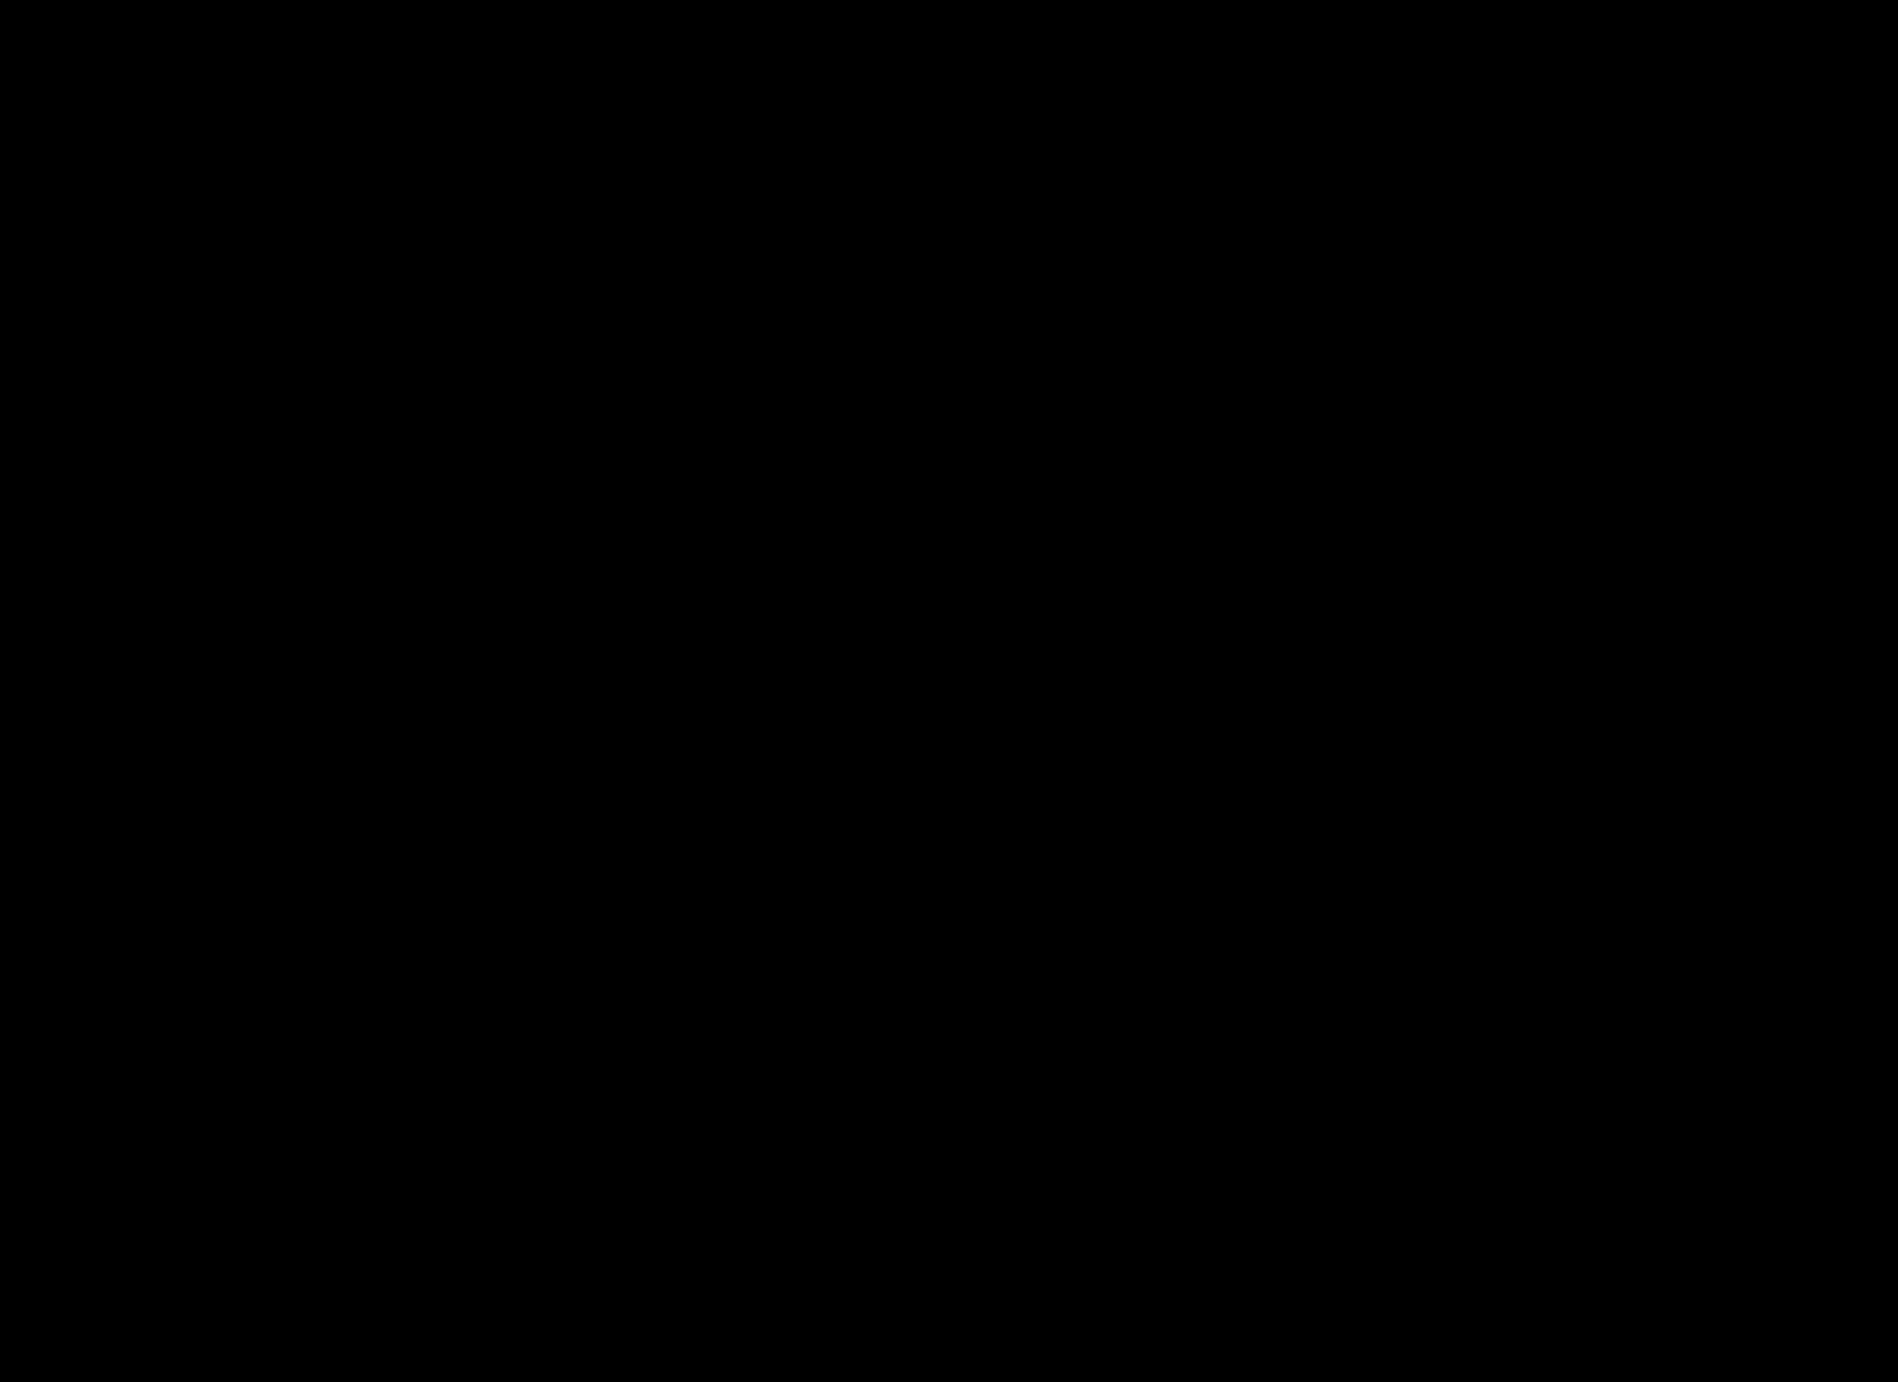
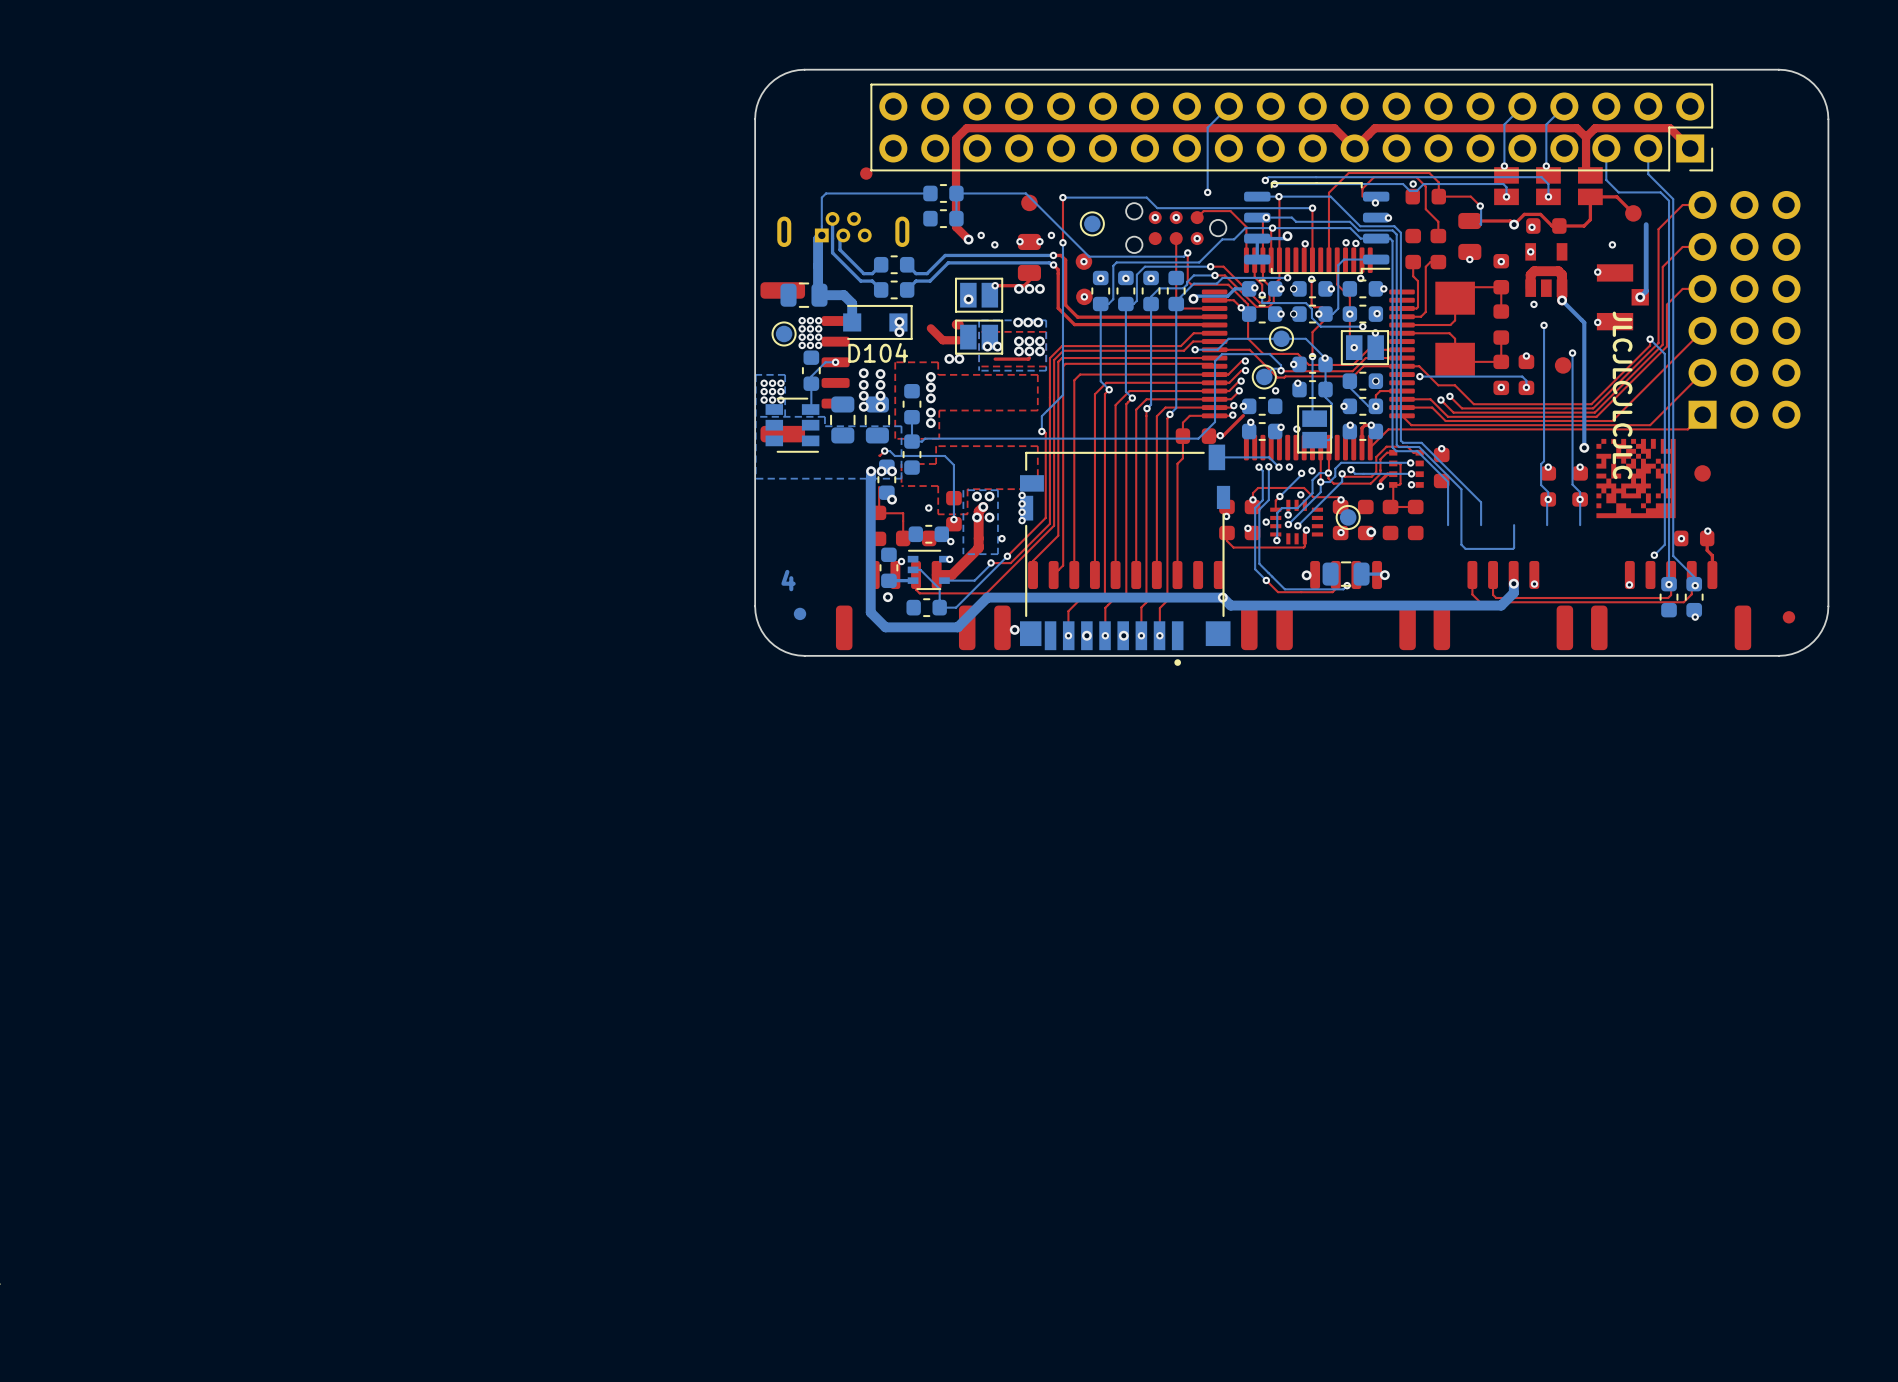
board edge: none -> (1778, 69) (804, 69) (791, 71) (779, 76) (769, 84) (761, 94) (756, 106) (755, 119) (755, 606) (756, 619) (761, 631) (769, 641) (779, 649) (791, 654) (804, 655) (1778, 655) (1791, 654) (1803, 649) (1813, 641) (1821, 631) (1826, 619) (1828, 606) (1828, 119) (1824, 100) (1813, 84) (1797, 73) (1778, 69)
bottom track: none -> (1228, 106) (1207, 127) (1207, 192)
bottom track: none -> (1522, 106) (1504, 124) (1504, 166)
bottom track: none -> (1564, 106) (1546, 124) (1546, 166)
part: none -> (1291, 127)
top track: none -> (1586, 137) (1595, 128) (1669, 128) (1690, 148)
top track: none -> (1586, 137) (1586, 171) (1590, 175)
top track: none -> (1586, 137) (1576, 128) (1374, 128) (1354, 148) (1334, 128) (966, 128) (956, 138) (956, 227) (968, 239)
bottom track: none -> (1606, 148) (1606, 180) (1618, 192) (1660, 192) (1669, 200) (1669, 584)
bottom track: none -> (1648, 148) (1648, 174) (1673, 199) (1673, 555) (1694, 576) (1694, 584)
via: none -> (1504, 166)
via: none -> (1546, 166)
part: none -> (866, 173)
bottom track: none -> (1265, 180) (1268, 177) (1541, 177) (1548, 184) (1548, 196)
via: none -> (1265, 180)
bottom track: none -> (1274, 184) (1403, 184) (1409, 190) (1416, 190) (1423, 184) (1503, 184) (1506, 187) (1506, 196)
via: none -> (1274, 184)
via: none -> (1413, 184)
part: none -> (1506, 186)
part: none -> (1548, 186)
part: none -> (1590, 186)
via: none -> (1207, 192)
bottom track: none -> (930, 193) (826, 193) (821, 197) (821, 235) (818, 239) (818, 293) (843, 295) (852, 303) (852, 322)
part: none -> (943, 193)
bottom track: none -> (1257, 196) (1330, 196) (1360, 226) (1394, 226) (1400, 232) (1400, 440) (1403, 442) (1421, 442) (1481, 502) (1481, 525)
top track: none -> (1278, 196) (1279, 279) (1273, 284) (1273, 302) (1269, 306) (1256, 306) (1225, 275) (1214, 275)
via: none -> (1278, 196)
top track: none -> (1362, 196) (1362, 188) (1374, 177) (1416, 177) (1425, 186) (1425, 209) (1438, 221) (1438, 236)
part: none -> (1425, 196)
via: none -> (1506, 196)
via: none -> (1548, 196)
bottom track: none -> (1062, 197) (1146, 197) (1157, 208) (1312, 208)
top track: none -> (1062, 197) (1062, 242)
via: none -> (1062, 197)
part: none -> (1029, 202)
via: none -> (1375, 202)
top track: none -> (1702, 205) (1682, 205) (1658, 229) (1658, 343) (1593, 408) (1461, 408) (1449, 396)
bottom track: none -> (1480, 206) (1480, 223)
top track: none -> (1480, 206) (1470, 196) (1438, 196) (1438, 182) (1429, 172) (1348, 172) (1328, 192) (1328, 260)
via: none -> (1480, 206)
top track: none -> (1312, 208) (1312, 260)
via: none -> (1312, 208)
top track: none -> (1633, 213) (1616, 196) (1590, 196) (1590, 219) (1584, 225) (1552, 225) (1540, 214) (1524, 214) (1514, 224) (1510, 220) (1469, 220)
part: none -> (1633, 213)
via: none -> (1155, 217)
via: none -> (1176, 217)
top track: none -> (1197, 217) (1203, 211) (1230, 211) (1246, 226) (1246, 260)
bottom track: none -> (1257, 217) (1291, 217) (1296, 221) (1349, 221) (1358, 230) (1392, 230) (1396, 234) (1396, 444) (1398, 447) (1419, 447) (1461, 489) (1461, 544) (1465, 548) (1513, 548) (1514, 525)
top track: none -> (1266, 217) (1262, 220) (1262, 279) (1269, 286) (1269, 300) (1267, 302) (1259, 302) (1223, 266) (1210, 266)
via: none -> (1266, 217)
bottom track: none -> (832, 218) (832, 252) (860, 281) (872, 281) (881, 289)
part: none -> (943, 218)
bottom track: none -> (956, 218) (956, 193) (1025, 193) (1089, 256) (1184, 256) (1187, 252)
via: none -> (1388, 218)
part: none -> (1092, 223)
via: none -> (1514, 224)
bottom track: none -> (1646, 224) (1646, 291) (1640, 297)
part: none -> (1546, 225)
via: none -> (1531, 227)
part: none -> (1176, 228)
top track: none -> (1272, 228) (1271, 260)
via: none -> (1272, 228)
part: none -> (1317, 228)
part: none -> (843, 229)
bottom track: none -> (843, 235) (839, 238) (839, 249) (863, 273) (872, 273) (881, 264)
via: none -> (981, 235)
via: none -> (1051, 235)
bottom track: none -> (1287, 236) (1285, 238) (1257, 238) (1257, 259)
via: none -> (1287, 236)
part: none -> (1469, 236)
top track: none -> (1176, 238) (1176, 303) (1181, 308) (1214, 308)
via: none -> (1197, 238)
via: none -> (968, 239)
via: none -> (1019, 241)
via: none -> (1039, 241)
bottom track: none -> (1062, 242) (1062, 395) (1041, 416) (1041, 431)
via: none -> (1062, 242)
via: none -> (1346, 242)
via: none -> (1305, 243)
via: none -> (1355, 243)
via: none -> (994, 244)
via: none -> (1612, 244)
top track: none -> (1702, 246) (1682, 246) (1662, 266) (1662, 344) (1594, 412) (1453, 412) (1440, 400)
part: none -> (1413, 249)
part: none -> (1438, 249)
via: none -> (1530, 251)
top track: none -> (1187, 252) (1187, 281) (1191, 284) (1228, 284) (1248, 304) (1248, 338) (1263, 353) (1297, 353) (1308, 364) (1352, 364) (1368, 349) (1402, 349)
via: none -> (1187, 252)
bottom track: none -> (1053, 255) (945, 255) (927, 273) (916, 273) (907, 264)
top track: none -> (1053, 255) (1060, 255) (1065, 260) (1065, 305) (1077, 317) (1214, 316)
via: none -> (1053, 255)
part: none -> (1029, 257)
bottom track: none -> (1376, 259) (1343, 259) (1338, 265) (1338, 308) (1332, 314) (1318, 314)
via: none -> (1469, 259)
top track: none -> (1254, 260) (1254, 277) (1262, 284) (1262, 295)
top track: none -> (1337, 260) (1337, 284) (1349, 297) (1349, 343) (1354, 347)
part: none -> (1083, 261)
via: none -> (1083, 261)
via: none -> (1501, 261)
top track: none -> (1413, 262) (1413, 276) (1417, 281) (1417, 307) (1402, 308)
top track: none -> (1438, 262) (1430, 262) (1425, 266) (1425, 311) (1420, 316) (1402, 316)
part: none -> (894, 264)
bottom track: none -> (1053, 264) (1049, 262) (948, 262) (930, 281) (916, 281) (907, 289)
top track: none -> (1053, 264) (1058, 269) (1058, 308) (1074, 324) (1214, 325)
via: none -> (1053, 264)
bottom track: none -> (1210, 266) (1144, 266) (1136, 274) (1136, 300) (1133, 303) (1125, 303) (1125, 391) (1132, 398)
via: none -> (1210, 266)
part: none -> (1546, 270)
via: none -> (1597, 272)
part: none -> (1501, 274)
bottom track: none -> (1214, 275) (1193, 275) (1183, 288) (1159, 288) (1151, 296) (1151, 404) (1147, 408)
via: none -> (1214, 275)
bottom track: none -> (1287, 277) (1222, 277) (1216, 283) (1193, 283) (1176, 301) (1176, 408) (1169, 414)
via: none -> (1287, 277)
via: none -> (1100, 278)
via: none -> (1125, 278)
via: none -> (1151, 278)
via: none -> (1360, 278)
top track: none -> (1311, 279) (1311, 304) (1314, 307) (1322, 307) (1325, 310) (1325, 318) (1312, 332) (1312, 356)
via: none -> (1311, 279)
top track: none -> (1029, 280) (1024, 285) (995, 285)
via: none -> (995, 285)
via: none -> (1254, 287)
via: none -> (1018, 288)
via: none -> (1029, 288)
via: none -> (1039, 288)
bottom track: none -> (1249, 288) (1234, 288) (1227, 296) (1194, 296)
part: none -> (1262, 288)
via: none -> (1281, 288)
via: none -> (1293, 288)
part: none -> (1312, 288)
via: none -> (1331, 288)
part: none -> (1362, 288)
via: none -> (1383, 288)
top track: none -> (1530, 288) (1530, 274) (1534, 271) (1558, 271) (1562, 274) (1562, 300)
top track: none -> (1702, 288) (1682, 288) (1666, 304) (1666, 346) (1596, 416) (1448, 416) (1430, 399) (1402, 399)
part: none -> (894, 289)
part: none -> (1100, 290)
part: none -> (1125, 290)
part: none -> (1151, 290)
part: none -> (1176, 290)
part: none -> (804, 295)
part: none -> (979, 295)
bottom track: none -> (1262, 295) (1262, 303) (1305, 303) (1311, 309) (1311, 317) (1320, 326) (1362, 326)
via: none -> (1262, 295)
part: none -> (1084, 296)
via: none -> (1084, 296)
part: none -> (1622, 297)
via: none -> (1640, 297)
via: none -> (1193, 298)
via: none -> (968, 299)
top track: none -> (1214, 300) (1233, 300) (1241, 307)
bottom track: none -> (1562, 300) (1584, 322) (1584, 447)
via: none -> (1562, 300)
via: none -> (1533, 304)
via: none -> (1241, 307)
part: none -> (1744, 309)
top track: none -> (1501, 311) (1501, 287) (1466, 287) (1455, 298) (1455, 320) (1450, 325) (1402, 325)
via: none -> (1377, 313)
part: none -> (1262, 314)
via: none -> (1281, 314)
via: none -> (1293, 314)
part: none -> (1312, 314)
via: none -> (1318, 314)
via: none -> (1349, 314)
part: none -> (1362, 314)
via: none -> (802, 320)
via: none -> (810, 320)
via: none -> (818, 320)
bottom zone outline: none -> (1046, 320) (1046, 370) (979, 370) (979, 320) (1046, 320)
D104: none -> (877, 322)
via: none -> (899, 322)
via: none -> (1018, 322)
via: none -> (1028, 322)
via: none -> (1038, 322)
via: none -> (1597, 322)
top track: none -> (958, 324) (956, 324)
part: none -> (1501, 324)
bottom track: none -> (1544, 325) (1544, 461) (1541, 464) (1541, 485) (1548, 492) (1547, 525)
via: none -> (1544, 325)
via: none -> (1362, 326)
via: none -> (802, 328)
via: none -> (810, 328)
via: none -> (818, 328)
top track: none -> (930, 328) (942, 340) (958, 340)
part: none -> (1455, 328)
top track: none -> (1702, 330) (1612, 421) (1445, 421) (1432, 407) (1402, 407)
top zone outline: none -> (1046, 331) (1046, 366) (979, 366) (979, 331) (1046, 331)
via: none -> (899, 332)
via: none -> (1375, 332)
part: none -> (784, 333)
top track: none -> (1214, 333) (1193, 333) (1180, 346) (1062, 346) (1049, 358) (1049, 523) (1010, 563) (991, 563)
top track: none -> (1402, 333) (1449, 333) (1455, 338) (1455, 359) (1457, 361) (1501, 361) (1501, 337)
via: none -> (802, 337)
via: none -> (810, 337)
via: none -> (818, 337)
part: none -> (979, 337)
part: none -> (1281, 338)
bottom track: none -> (1650, 339) (1664, 353) (1664, 544) (1654, 555)
top track: none -> (1650, 339) (1650, 345) (1591, 404) (1473, 404) (1454, 385) (1438, 385) (1419, 366) (1363, 366) (1353, 376) (1277, 377) (1249, 349) (1214, 349)
via: none -> (1650, 339)
via: none -> (1018, 341)
via: none -> (1029, 341)
via: none -> (1039, 341)
top track: none -> (1214, 341) (1193, 341) (1183, 350) (1063, 350) (1054, 359) (1054, 525) (986, 593) (919, 593) (916, 589) (916, 575)
via: none -> (802, 345)
via: none -> (810, 345)
via: none -> (818, 345)
via: none -> (987, 346)
via: none -> (997, 346)
via: none -> (1354, 347)
part: none -> (1364, 347)
bottom track: none -> (1195, 349) (1217, 349) (1228, 338) (1305, 338) (1325, 358)
via: none -> (1195, 349)
via: none -> (1018, 351)
via: none -> (1029, 351)
via: none -> (1039, 351)
part: none -> (1308, 353)
bottom track: none -> (1572, 353) (1572, 484) (1580, 492) (1580, 499)
via: none -> (1572, 353)
bottom track: none -> (1312, 356) (1312, 414) (1316, 418)
via: none -> (1312, 356)
via: none -> (1526, 356)
via: none -> (949, 358)
via: none -> (959, 358)
top track: none -> (1029, 358) (995, 359)
top track: none -> (1214, 358) (1062, 358) (1058, 361) (1058, 535) (1033, 560) (1033, 575)
via: none -> (1325, 358)
top track: none -> (1402, 358) (1365, 358) (1352, 371) (1281, 370)
top track: none -> (1245, 361) (1241, 361) (1228, 374) (1080, 374) (1074, 380) (1074, 575)
via: none -> (1245, 361)
part: none -> (805, 362)
bottom track: none -> (835, 362) (825, 362) (811, 376) (810, 409)
via: none -> (835, 362)
top zone outline: none -> (938, 362) (938, 374) (1037, 374) (1037, 410) (939, 410) (939, 438) (895, 438) (895, 362) (938, 362)
via: none -> (1293, 364)
part: none -> (1312, 364)
bottom track: none -> (1325, 364) (1325, 397) (1331, 403) (1331, 437) (1329, 440) (1314, 440)
part: none -> (1563, 365)
top track: none -> (1214, 366) (1212, 363) (1065, 363) (1063, 366) (1063, 565) (1053, 575)
part: none -> (811, 370)
top track: none -> (1245, 370) (1241, 370) (1229, 382) (1106, 382) (1094, 394) (1094, 575)
via: none -> (1245, 370)
via: none -> (1281, 370)
top track: none -> (1702, 372) (1650, 425) (1411, 425) (1402, 415)
via: none -> (863, 373)
via: none -> (880, 374)
part: none -> (1501, 374)
part: none -> (1526, 374)
via: none -> (930, 376)
bottom track: none -> (1264, 376) (1272, 368) (1281, 370) (1281, 365) (1269, 354) (1222, 354) (1215, 361) (1215, 422) (1198, 438) (924, 438) (922, 441) (912, 441) (912, 417)
part: none -> (1264, 376)
bottom track: none -> (1419, 376) (1522, 376) (1526, 380) (1526, 387)
via: none -> (1419, 376)
top track: none -> (1241, 381) (1229, 391) (1129, 391) (1115, 405) (1115, 575)
via: none -> (1241, 381)
bottom track: none -> (1349, 381) (1349, 387) (1368, 406) (1375, 406)
part: none -> (1362, 381)
via: none -> (1375, 381)
via: none -> (764, 383)
via: none -> (772, 383)
via: none -> (780, 383)
via: none -> (1297, 383)
via: none -> (863, 384)
via: none -> (880, 384)
via: none -> (930, 387)
via: none -> (1501, 387)
via: none -> (1526, 387)
bottom track: none -> (1109, 389) (1100, 381) (1100, 303) (1108, 303) (1113, 299) (1113, 265) (1116, 262) (1199, 262) (1222, 239) (1234, 239) (1245, 228) (1350, 228) (1360, 238) (1390, 238) (1392, 240) (1392, 447) (1396, 451) (1417, 451) (1448, 481) (1448, 525)
top track: none -> (1109, 389) (1104, 394) (1104, 593) (1101, 597) (1082, 597) (1068, 611) (1068, 635)
via: none -> (1109, 389)
part: none -> (1312, 389)
top track: none -> (1239, 390) (1231, 399) (1146, 399) (1136, 409) (1136, 575)
via: none -> (1239, 390)
via: none -> (1275, 390)
via: none -> (764, 391)
via: none -> (772, 391)
via: none -> (780, 391)
top track: none -> (1402, 391) (1380, 391) (1375, 395) (1375, 406)
via: none -> (863, 395)
via: none -> (880, 395)
text: none -> JLCJLCJLCJLC (1622, 395)
via: none -> (1449, 396)
via: none -> (930, 398)
top track: none -> (1132, 398) (1126, 404) (1126, 593) (1122, 597) (1116, 597) (1105, 607) (1105, 635)
via: none -> (1132, 398)
via: none -> (764, 400)
via: none -> (772, 400)
via: none -> (780, 400)
via: none -> (1440, 400)
part: none -> (912, 404)
top track: none -> (1233, 405) (1231, 407) (1165, 407) (1156, 416) (1156, 575)
via: none -> (1233, 405)
via: none -> (863, 406)
via: none -> (880, 406)
via: none -> (1243, 406)
part: none -> (1262, 406)
via: none -> (1343, 406)
part: none -> (1362, 406)
via: none -> (1375, 406)
top track: none -> (1147, 408) (1146, 602) (1141, 607) (1141, 635)
via: none -> (1147, 408)
via: none -> (930, 412)
top track: none -> (1169, 414) (1167, 418) (1167, 600) (1159, 608) (1159, 635)
via: none -> (1169, 414)
top track: none -> (1702, 414) (1687, 429) (1388, 429) (1370, 447)
top track: none -> (1232, 415) (1189, 415) (1182, 422) (1182, 458) (1177, 463) (1177, 575)
via: none -> (1232, 415)
top track: none -> (1243, 415) (1223, 435) (1208, 436)
bottom zone outline: none -> (785, 416) (785, 374) (755, 374) (755, 478) (901, 478) (901, 426) (824, 426) (824, 416) (755, 416)
part: none -> (842, 419)
part: none -> (877, 419)
via: none -> (1250, 422)
via: none -> (930, 423)
part: none -> (792, 425)
via: none -> (1350, 425)
top track: none -> (1371, 425) (1364, 425) (1362, 428) (1362, 447)
via: none -> (1371, 425)
via: none -> (1281, 427)
via: none -> (1296, 429)
part: none -> (1314, 429)
top track: none -> (1041, 431) (1045, 433) (1045, 517) (1007, 556)
via: none -> (1041, 431)
part: none -> (1262, 431)
part: none -> (1362, 431)
via: none -> (1220, 435)
part: none -> (1195, 436)
top zone outline: none -> (1037, 446) (1037, 489) (967, 489) (967, 514) (938, 514) (938, 486) (901, 486) (901, 464) (936, 464) (936, 446) (1037, 446)
top track: none -> (1320, 447) (1320, 482)
top track: none -> (1328, 447) (1328, 478) (1333, 483) (1370, 483) (1380, 473) (1380, 459) (1387, 452) (1393, 452)
via: none -> (1584, 447)
via: none -> (1441, 448)
bottom track: none -> (884, 451) (889, 451) (894, 455) (944, 455) (953, 465) (953, 519)
top track: none -> (884, 451) (879, 455)
via: none -> (884, 451)
top track: none -> (1419, 452) (1413, 452) (1407, 446) (1386, 446) (1376, 457) (1376, 472) (1371, 476) (1344, 476) (1341, 473)
part: none -> (912, 454)
bottom track: none -> (1216, 457) (1269, 457) (1278, 467)
bottom track: none -> (1410, 462) (1341, 462) (1335, 468) (1335, 476) (1329, 482) (1320, 482) (1320, 492) (1288, 524)
via: none -> (1410, 462)
top track: none -> (1393, 463) (1400, 464) (1400, 483) (1393, 484) (1393, 504) (1390, 506) (1415, 506)
bottom track: none -> (1268, 466) (1268, 500) (1259, 509) (1259, 563) (1284, 589) (1343, 589) (1347, 585)
via: none -> (1268, 466)
bottom track: none -> (1259, 467) (1262, 470) (1262, 500) (1255, 507) (1255, 569) (1266, 580)
via: none -> (1259, 467)
via: none -> (1278, 467)
via: none -> (1289, 467)
part: none -> (1441, 467)
via: none -> (1548, 467)
via: none -> (1580, 467)
part: none -> (1406, 468)
bottom track: none -> (1350, 469) (1355, 473) (1411, 473)
via: none -> (1350, 469)
via: none -> (1312, 470)
bottom track: none -> (871, 471) (870, 612) (885, 627) (957, 627) (987, 597) (1222, 597) (1230, 605) (1501, 605) (1513, 592) (1513, 583)
via: none -> (871, 471)
via: none -> (881, 471)
via: none -> (892, 471)
bottom track: none -> (1301, 473) (1279, 496)
via: none -> (1301, 473)
bottom track: none -> (1328, 473) (1319, 473) (1312, 480) (1312, 493) (1297, 508) (1282, 508) (1277, 512) (1276, 540)
via: none -> (1328, 473)
bottom track: none -> (1342, 473) (1342, 481) (1297, 525)
via: none -> (1342, 473)
via: none -> (1411, 473)
part: none -> (1702, 473)
top track: none -> (1393, 474) (1387, 474) (1380, 481) (1380, 486)
part: none -> (1636, 478)
part: none -> (886, 479)
via: none -> (1320, 482)
via: none -> (1411, 484)
via: none -> (1380, 486)
part: none -> (1548, 486)
part: none -> (1580, 486)
top track: none -> (879, 487) (878, 512) (903, 513) (903, 538)
bottom zone outline: none -> (997, 490) (997, 554) (963, 554) (963, 490) (997, 490)
via: none -> (1300, 494)
via: none -> (1022, 495)
via: none -> (977, 496)
via: none -> (989, 496)
top track: none -> (1279, 496) (1275, 500) (1275, 509)
via: none -> (1279, 496)
via: none -> (892, 499)
top track: none -> (1252, 499) (1252, 493) (1258, 487) (1304, 487) (1313, 497) (1338, 497) (1340, 499) (1340, 506)
via: none -> (1252, 499)
via: none -> (1341, 499)
via: none -> (1548, 499)
bottom track: none -> (1580, 499) (1580, 525)
via: none -> (1580, 499)
via: none -> (1022, 503)
top track: none -> (983, 506) (978, 511) (978, 548) (951, 575) (936, 575)
via: none -> (983, 506)
via: none -> (928, 508)
part: none -> (953, 511)
via: none -> (1022, 512)
via: none -> (1288, 514)
via: none -> (1226, 516)
via: none -> (977, 517)
via: none -> (989, 517)
part: none -> (1348, 517)
via: none -> (953, 519)
part: none -> (1226, 519)
part: none -> (1252, 519)
part: none -> (1340, 519)
part: none -> (1365, 519)
part: none -> (1390, 519)
part: none -> (1415, 519)
via: none -> (1022, 520)
via: none -> (1266, 522)
part: none -> (1296, 522)
via: none -> (1288, 524)
part: none -> (878, 525)
via: none -> (1297, 525)
top track: none -> (1306, 527) (1303, 547) (1233, 547) (1226, 540) (1226, 532)
via: none -> (1247, 528)
via: none -> (1306, 530)
via: none -> (1707, 531)
via: none -> (1341, 532)
via: none -> (1371, 532)
part: none -> (928, 534)
part: none -> (916, 538)
via: none -> (1001, 538)
via: none -> (1681, 538)
part: none -> (1694, 538)
top track: none -> (1707, 538) (1707, 550) (1712, 555) (1712, 575)
via: none -> (1276, 540)
via: none -> (950, 541)
part: none -> (1125, 555)
via: none -> (1654, 555)
bottom track: none -> (1007, 556) (956, 607) (939, 607) (939, 589) (920, 569) (913, 569)
via: none -> (1007, 556)
via: none -> (949, 559)
via: none -> (901, 561)
via: none -> (991, 562)
bottom track: none -> (989, 565) (974, 580) (944, 580)
part: none -> (888, 567)
part: none -> (928, 569)
part: none -> (1346, 574)
bottom track: none -> (1369, 574) (1384, 575)
via: none -> (1306, 575)
top track: none -> (1335, 575) (1335, 589) (1332, 592) (1278, 592) (1266, 580)
via: none -> (1384, 575)
top track: none -> (1671, 575) (1671, 595) (1668, 597) (1496, 597) (1493, 594) (1493, 575)
top track: none -> (1691, 575) (1691, 594) (1683, 602) (1480, 602) (1472, 594) (1472, 575)
text: none -> 4 (788, 580)
bottom track: none -> (913, 580) (889, 580)
via: none -> (1266, 580)
via: none -> (1513, 583)
via: none -> (1534, 584)
via: none -> (1629, 584)
via: none -> (1669, 584)
via: none -> (1347, 585)
via: none -> (1695, 585)
via: none -> (887, 597)
via: none -> (1222, 597)
part: none -> (1669, 597)
part: none -> (1694, 597)
part: none -> (905, 605)
part: none -> (1125, 605)
part: none -> (1346, 605)
part: none -> (1503, 605)
part: none -> (1671, 605)
part: none -> (926, 607)
part: none -> (800, 613)
via: none -> (1695, 617)
part: none -> (1788, 617)
via: none -> (1014, 629)
via: none -> (1068, 635)
via: none -> (1086, 635)
via: none -> (1105, 635)
via: none -> (1123, 635)
via: none -> (1141, 635)
via: none -> (1159, 635)

